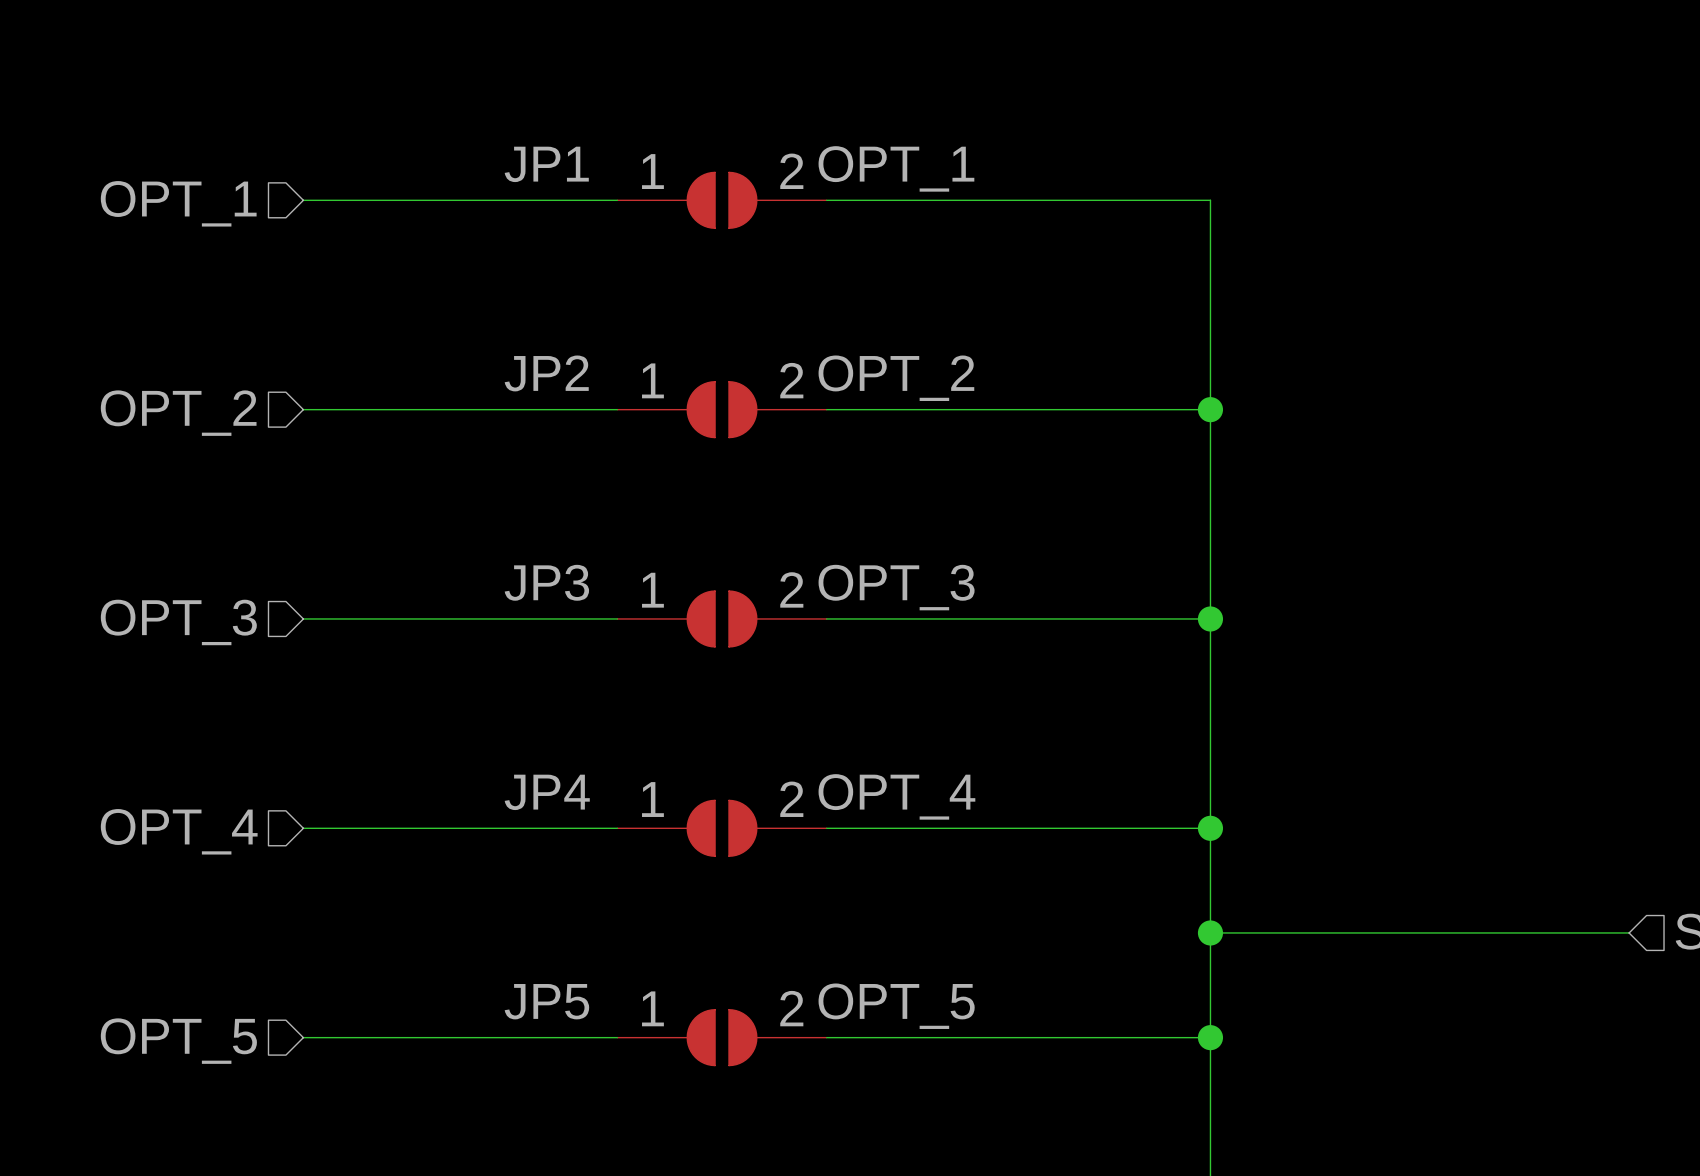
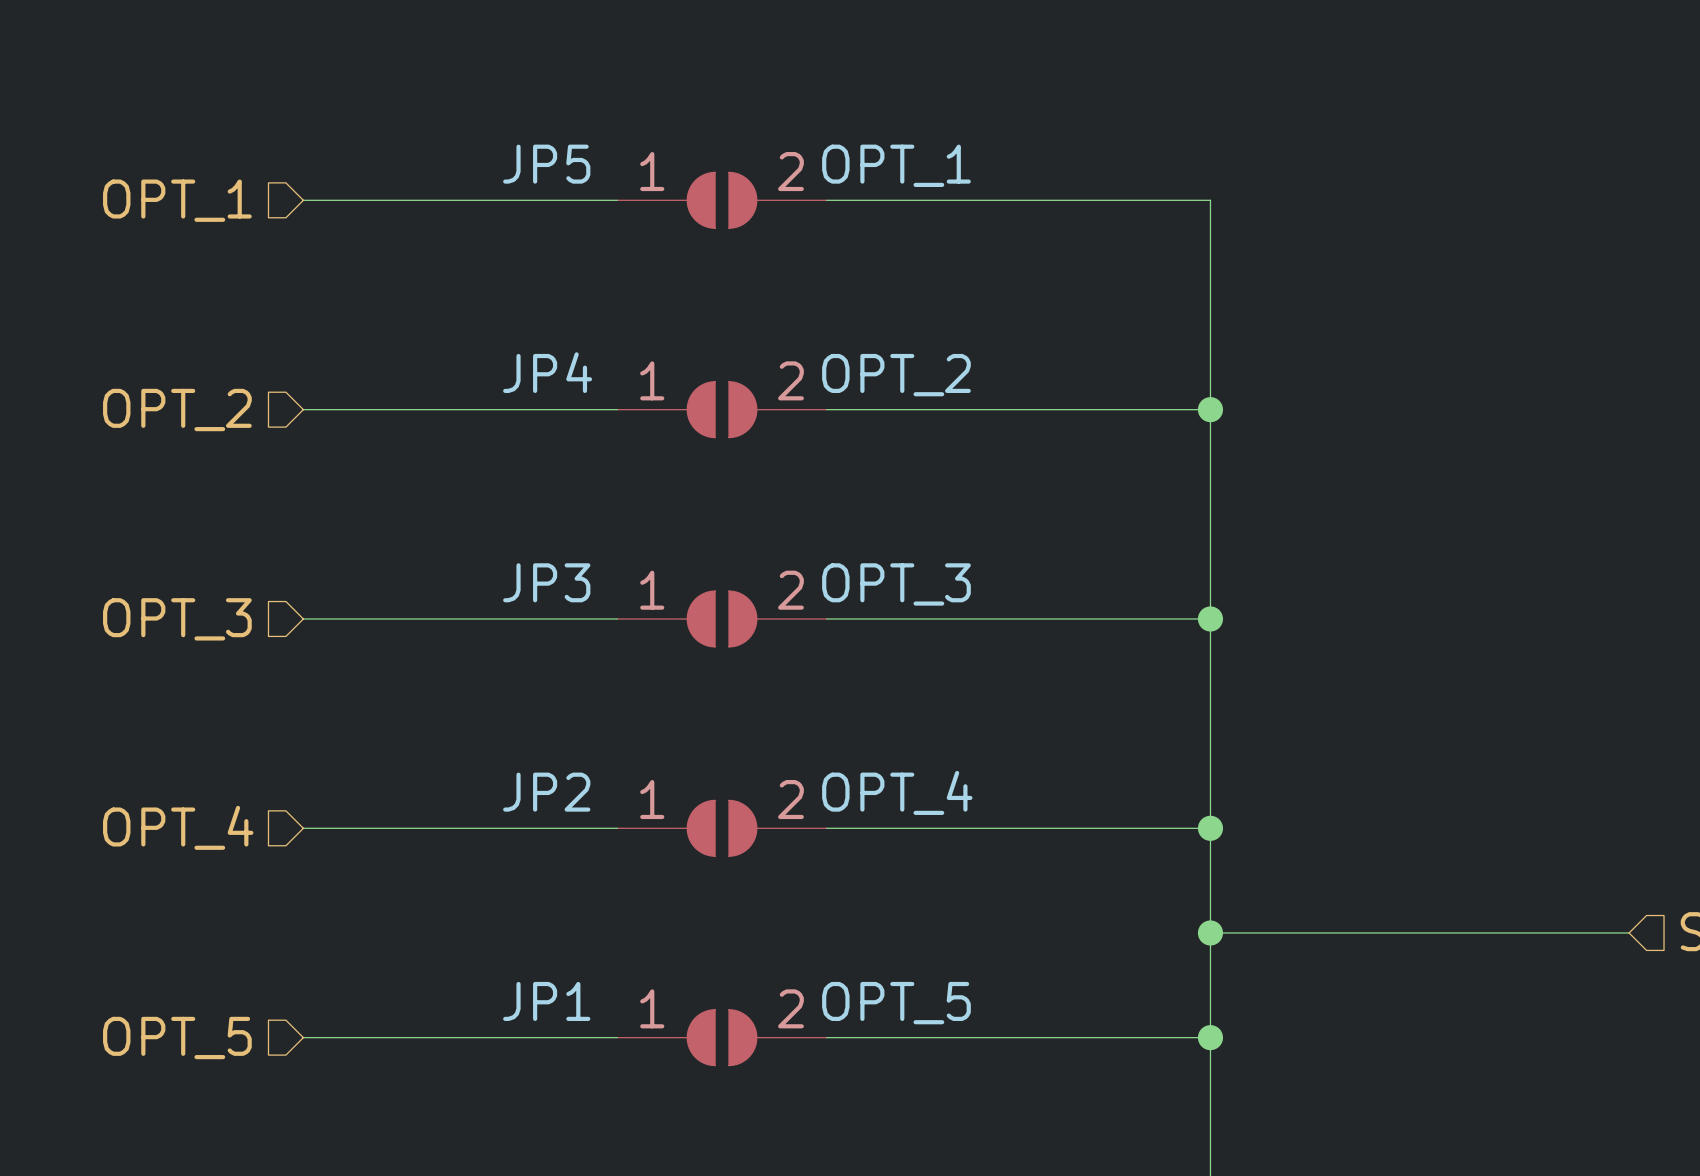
JP1 name: JP1 (546, 164) -> JP5 (546, 164)
JP2 name: JP2 (546, 373) -> JP4 (547, 372)
JP4 name: JP4 (547, 792) -> JP2 (546, 792)
JP5 name: JP5 (546, 1001) -> JP1 (546, 1001)

